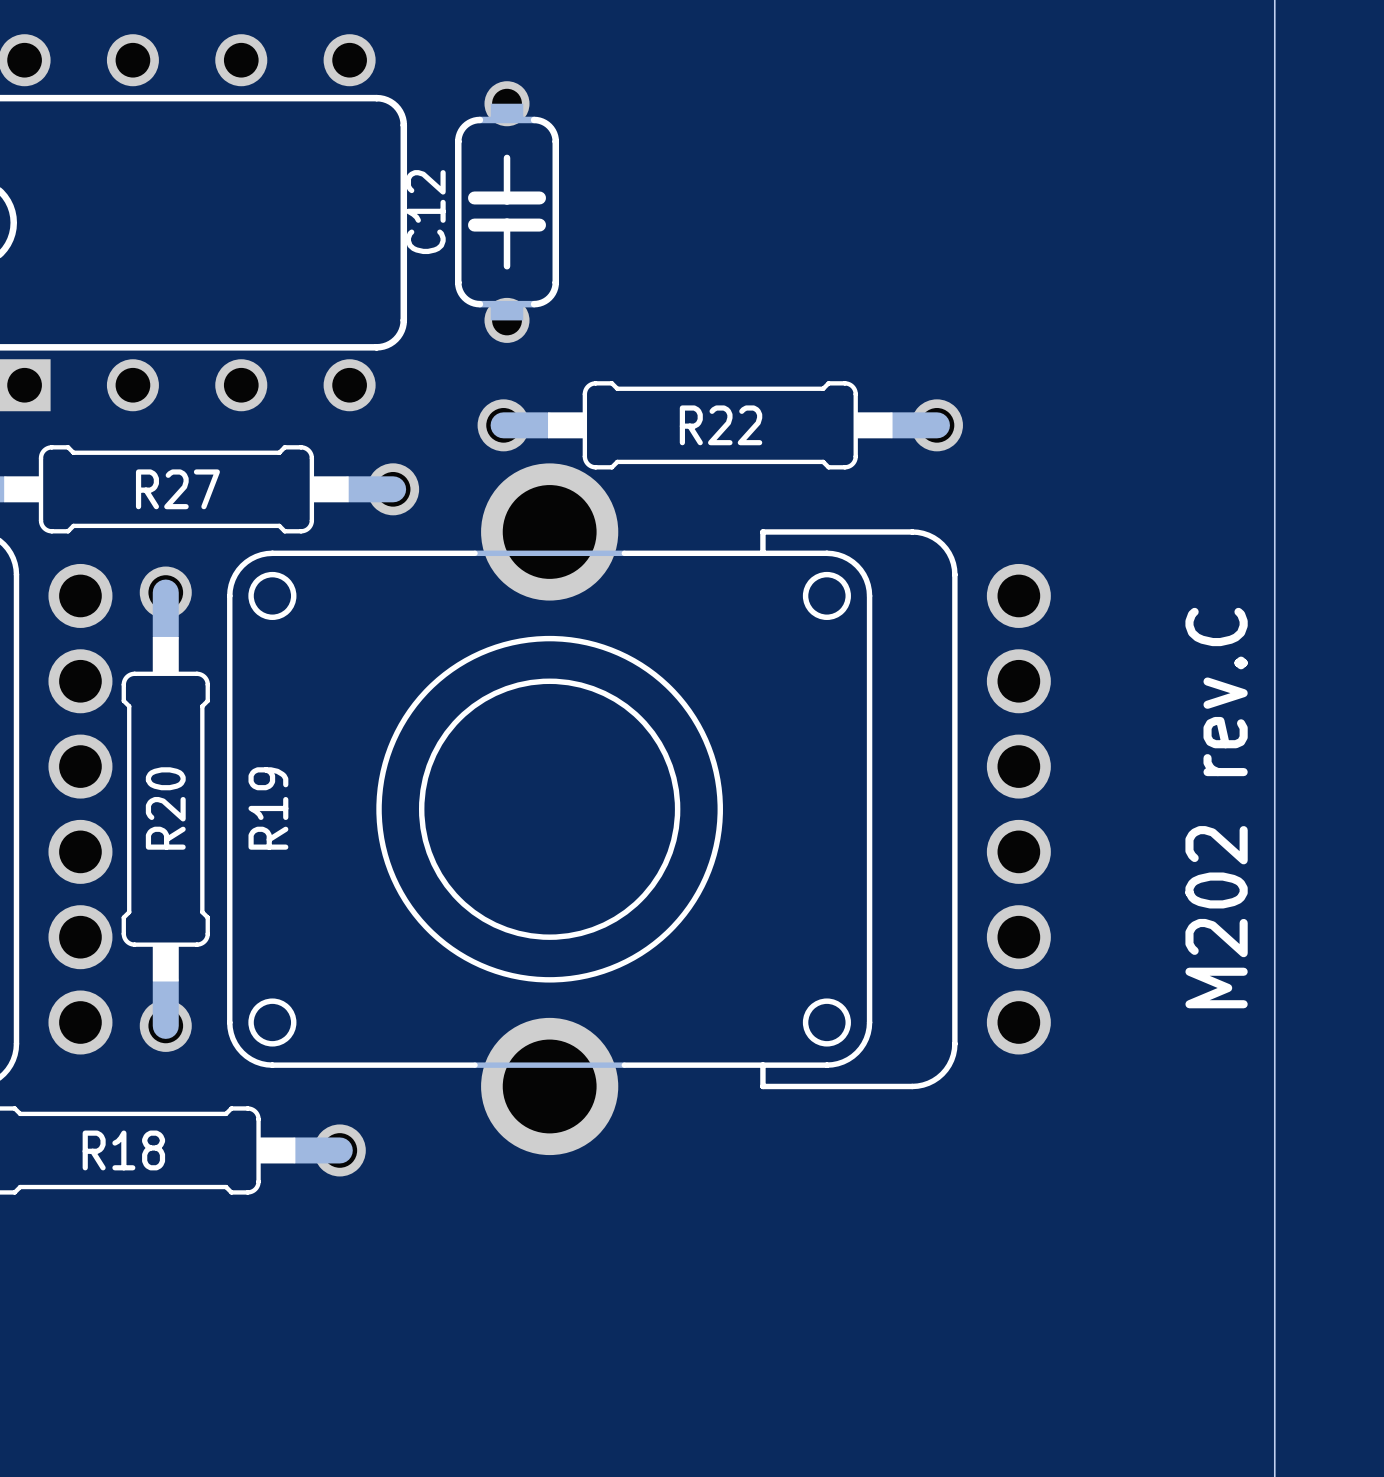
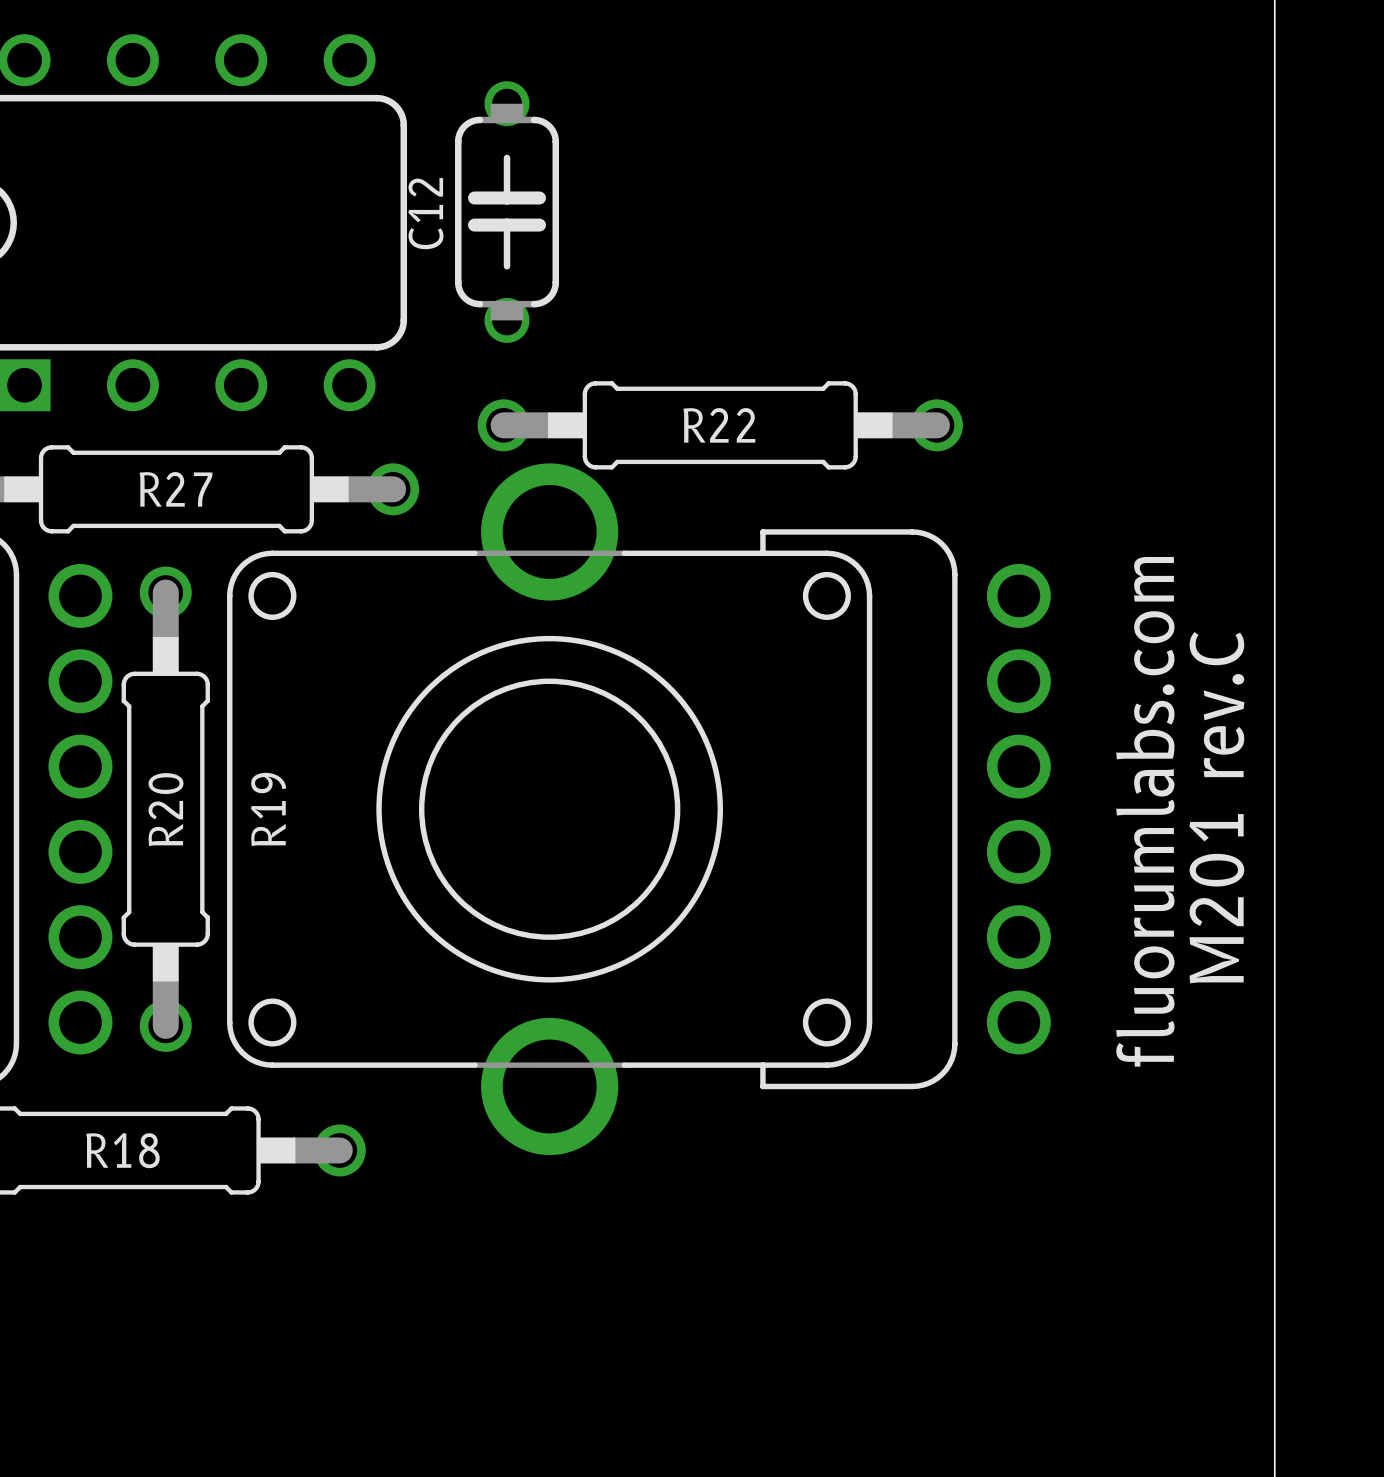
part value: M202 rev.C (1216, 808) -> M201 rev.C (1216, 807)
part text: none -> fluorumlabs.com (1145, 811)

